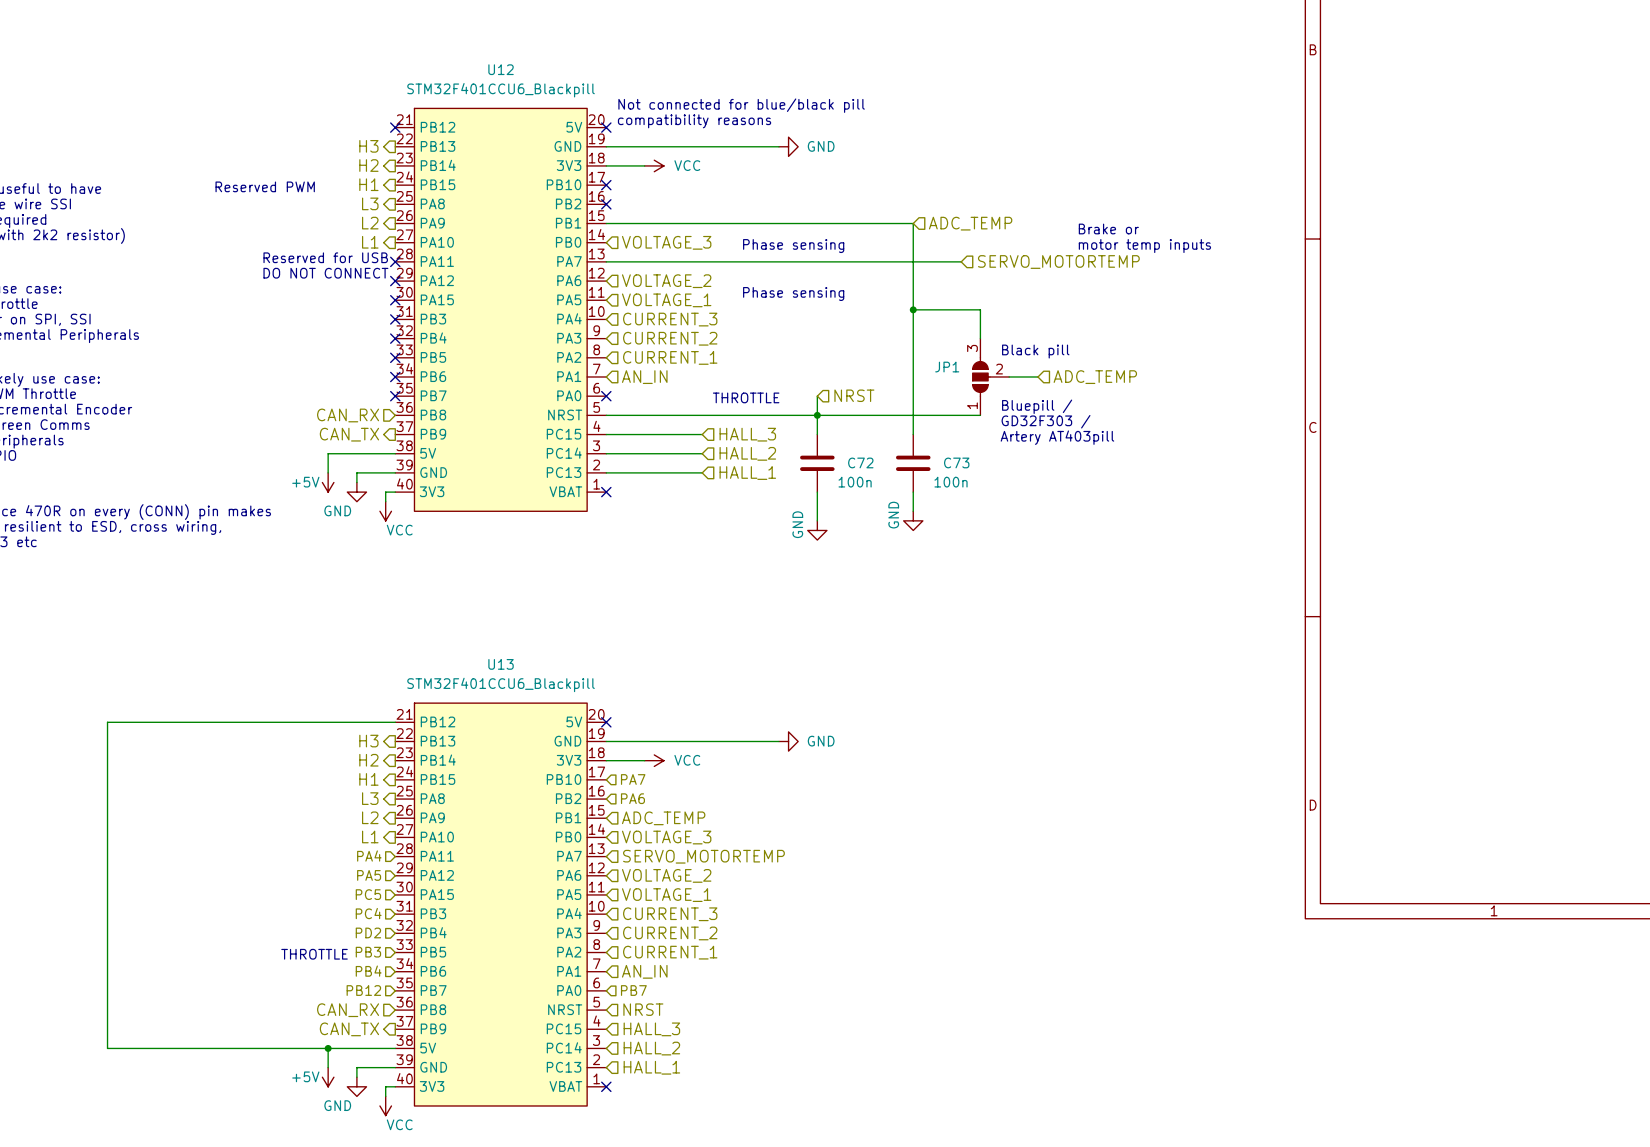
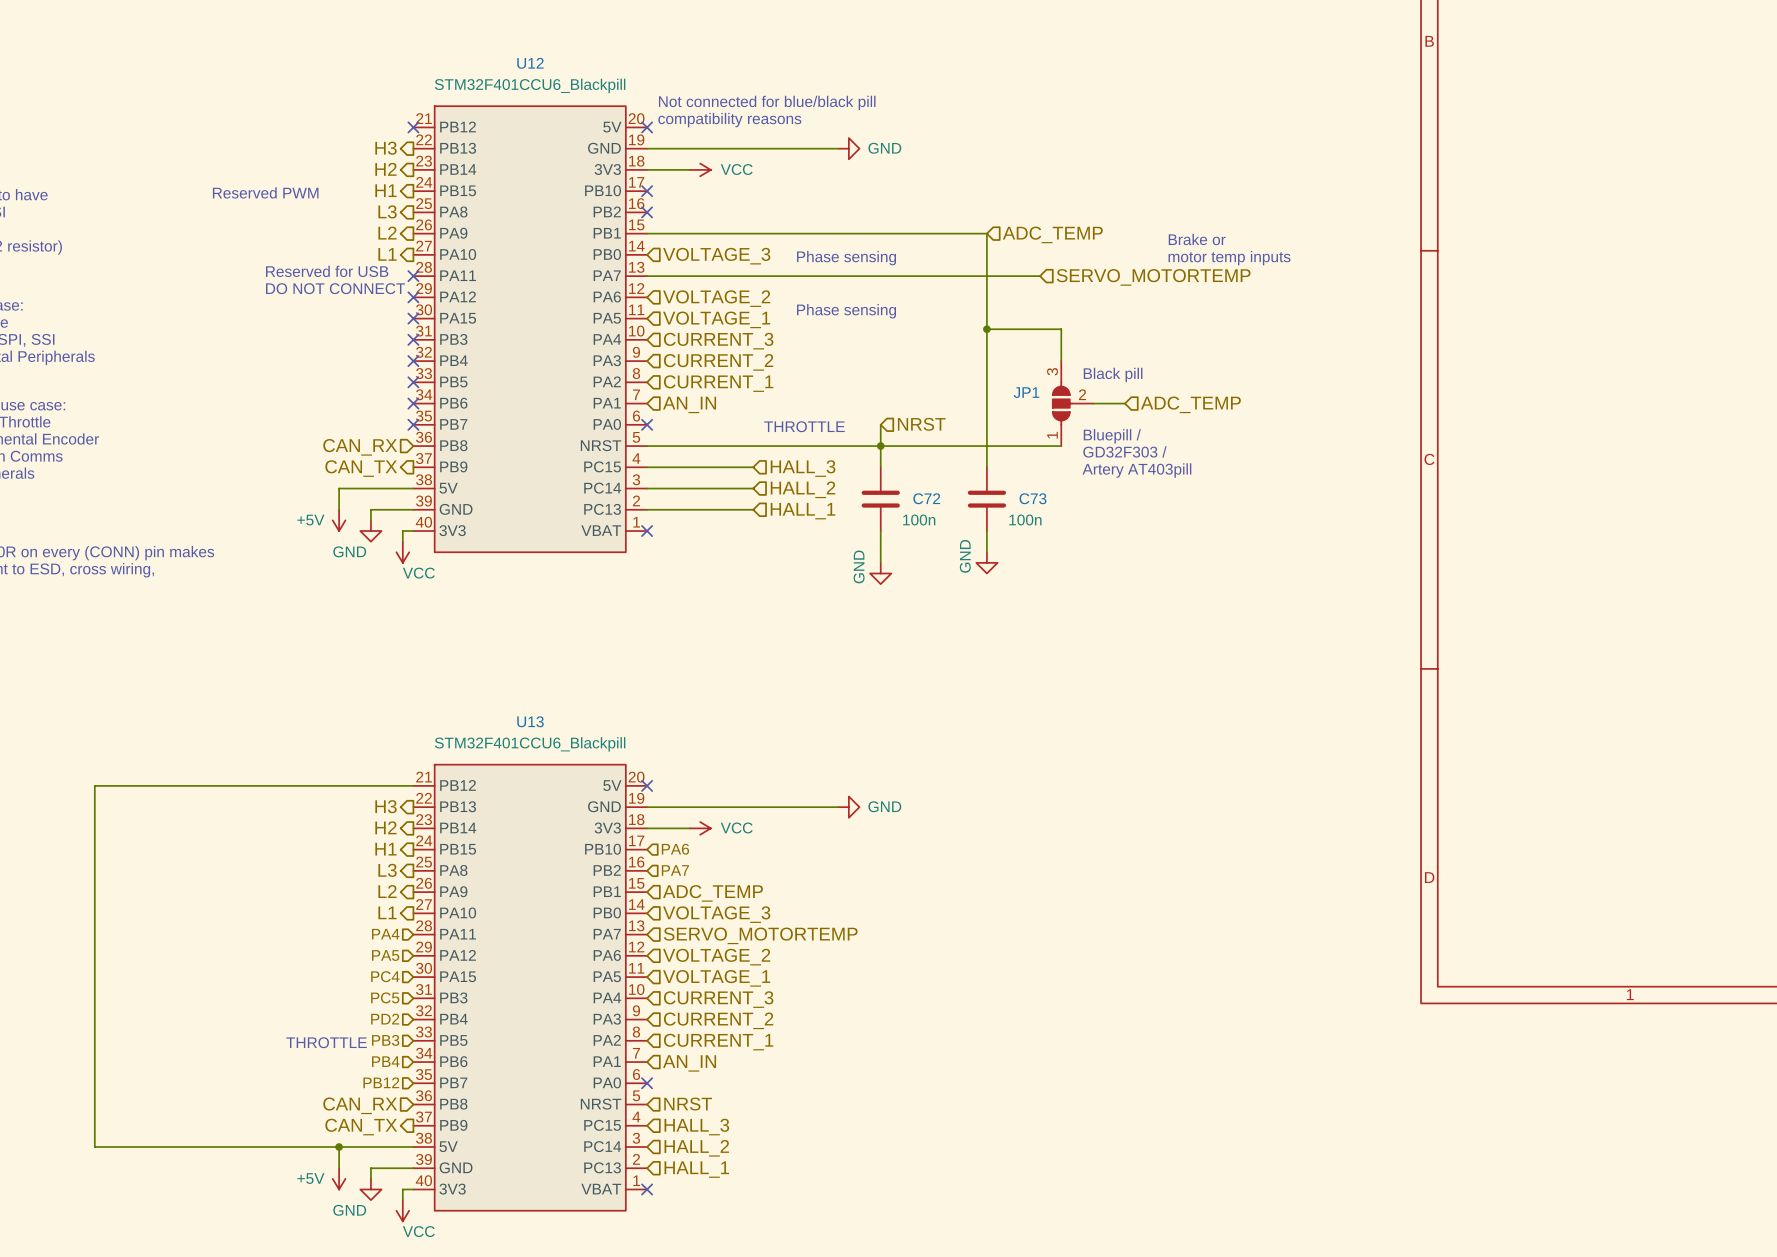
hierarchical label: PA7 (633, 779) -> PA6 (675, 849)
hierarchical label: PA6 (632, 798) -> PA7 (675, 870)
hierarchical label: PC5 (368, 894) -> PC4 (385, 976)
hierarchical label: PC4 (368, 913) -> PC5 (385, 997)
no-connect mark: none -> (647, 1083)
hierarchical label: PB7 (633, 990) -> none

